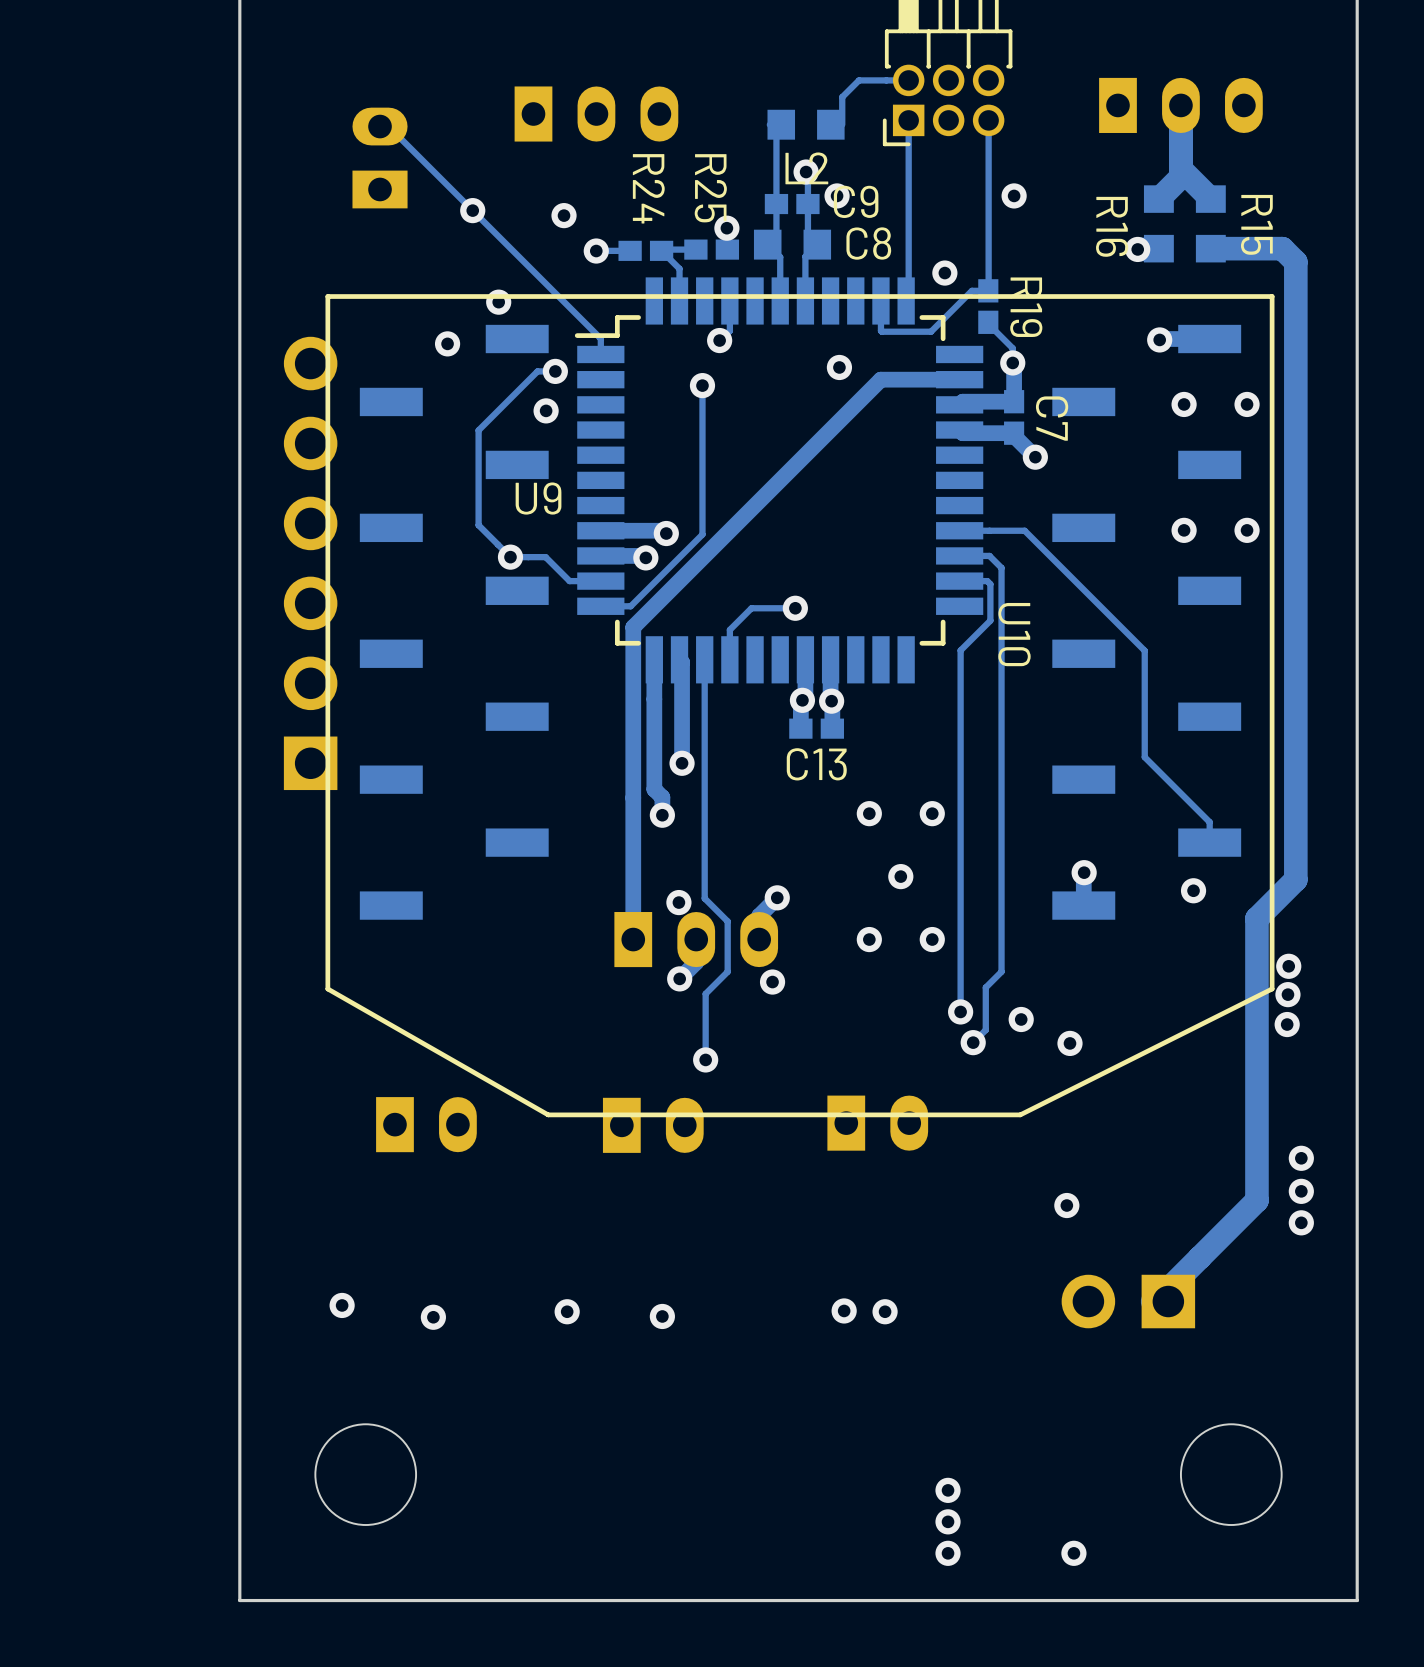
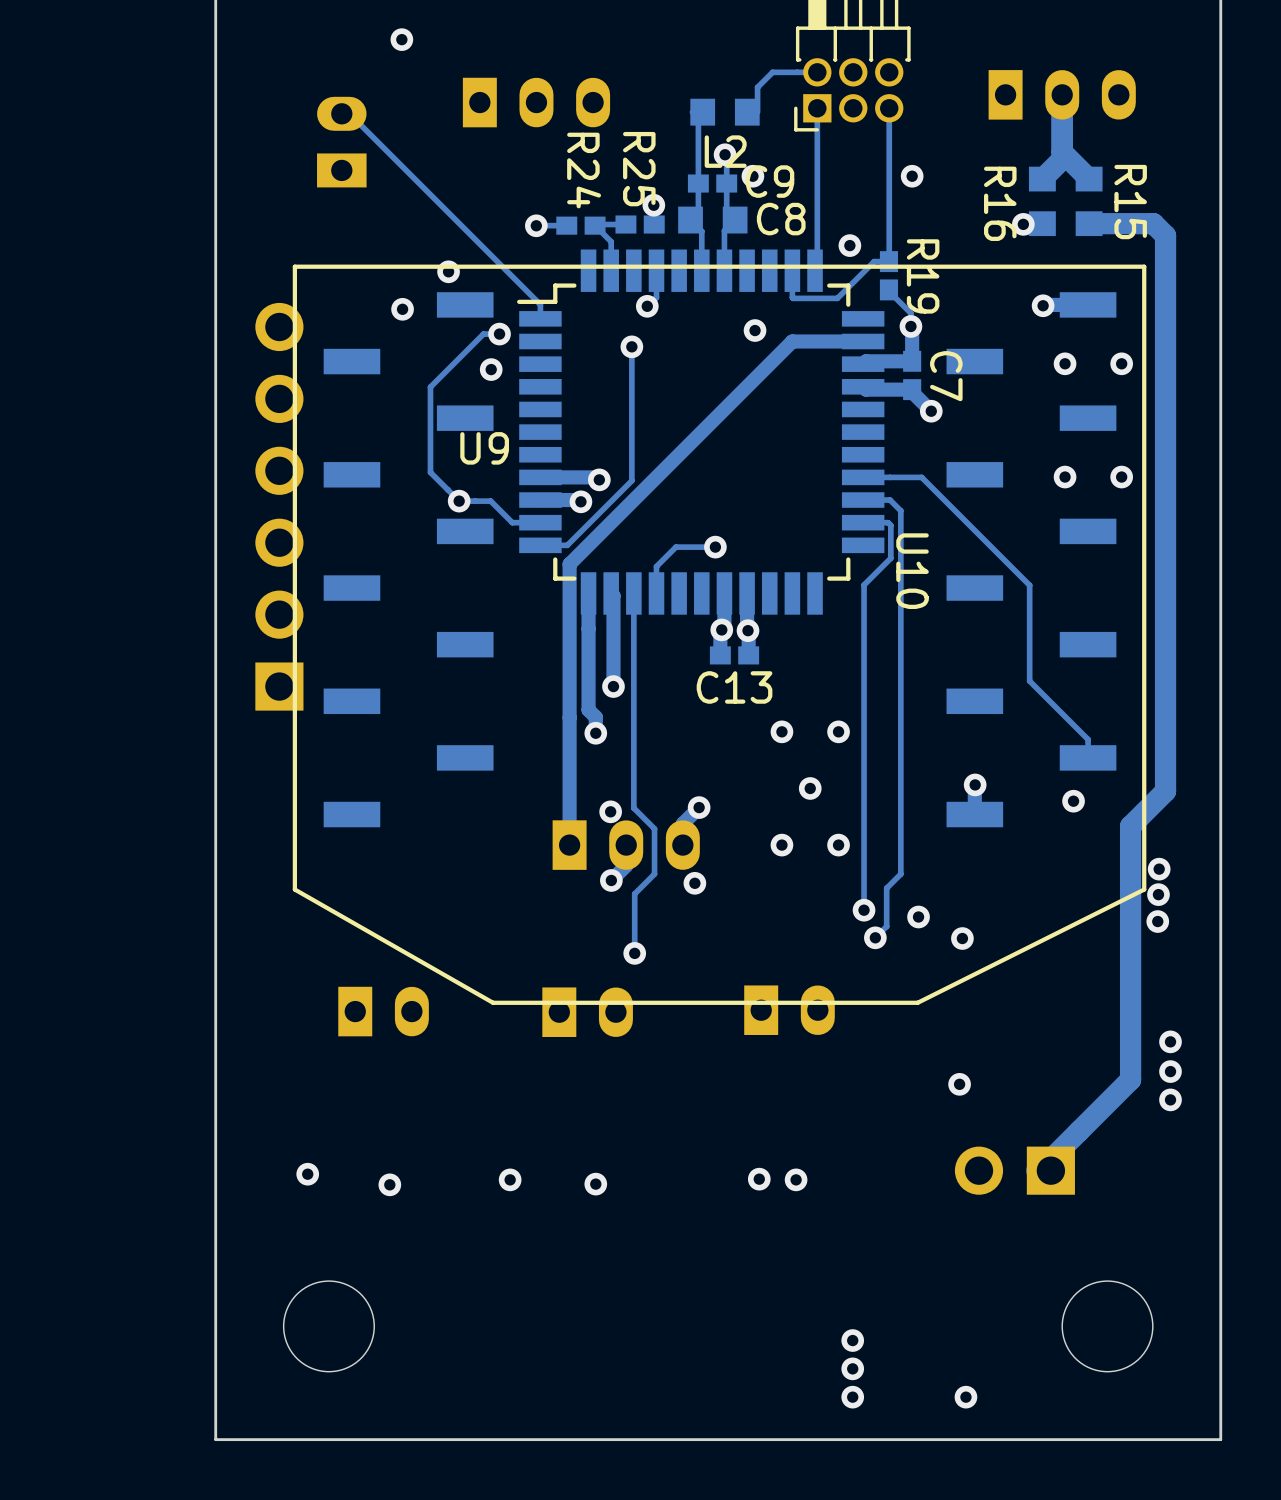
via: none -> (401, 39)
via: (472, 210) -> none
via: (564, 215) -> none

